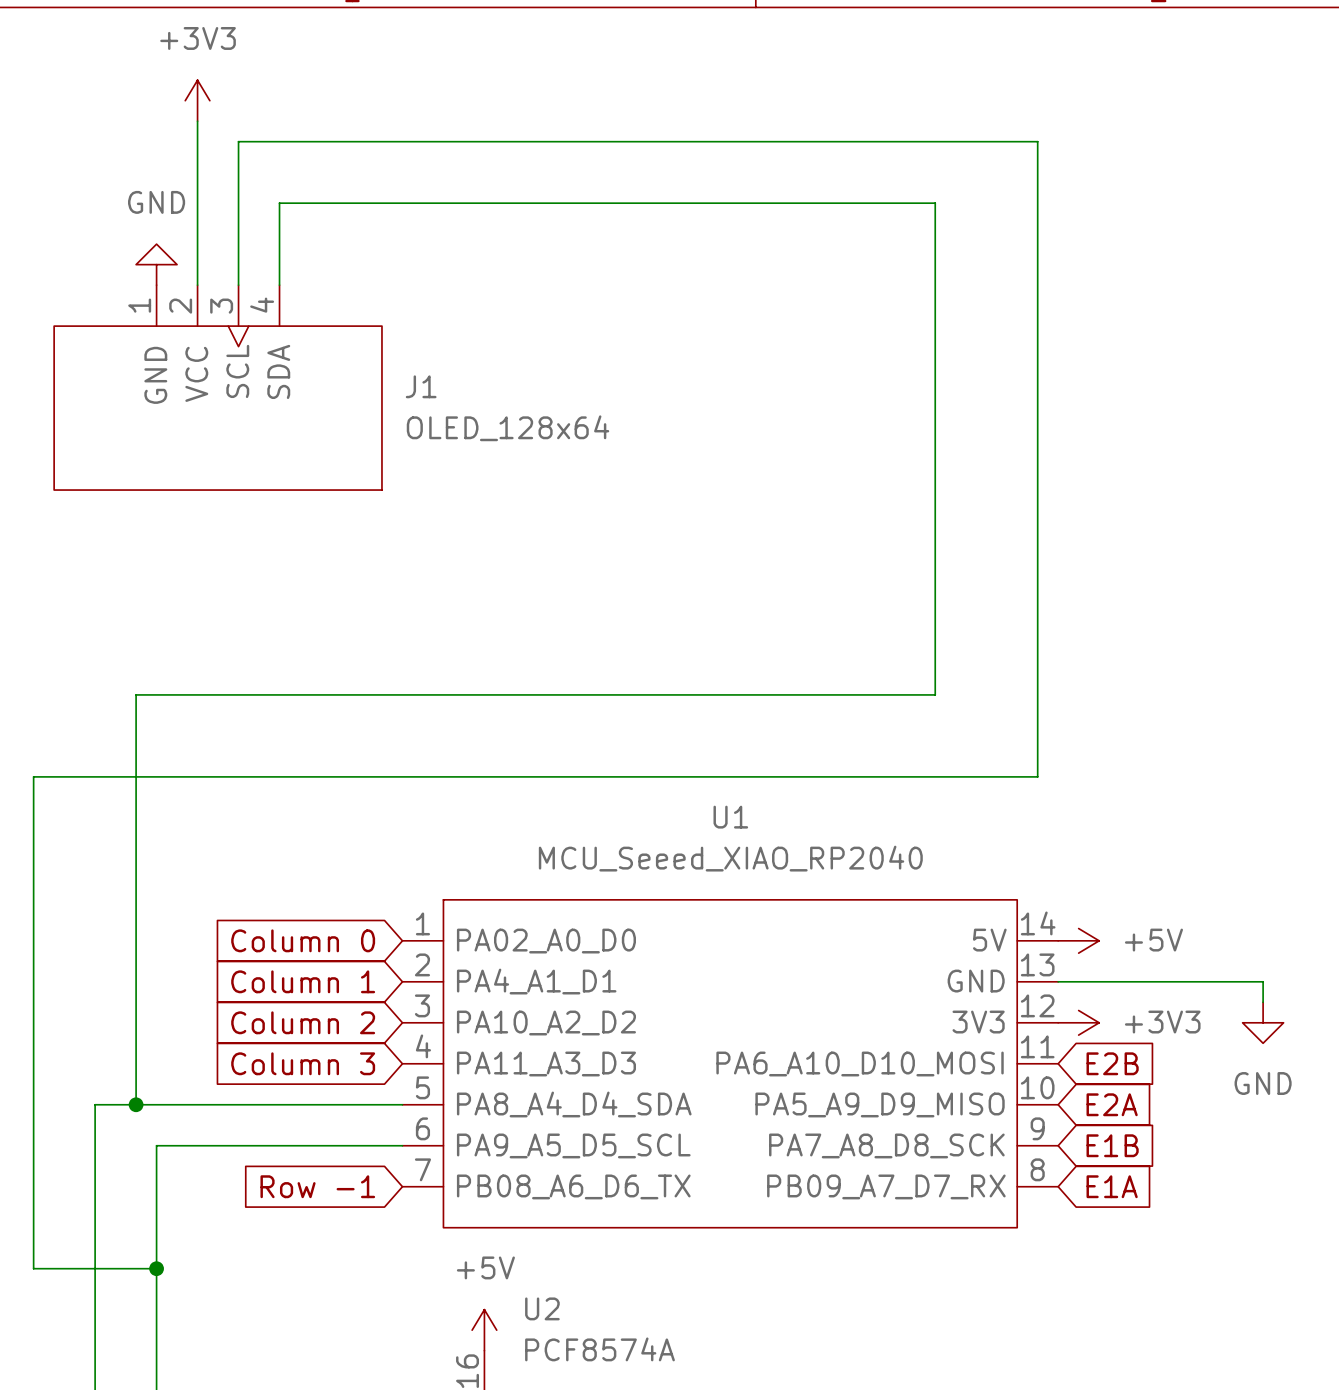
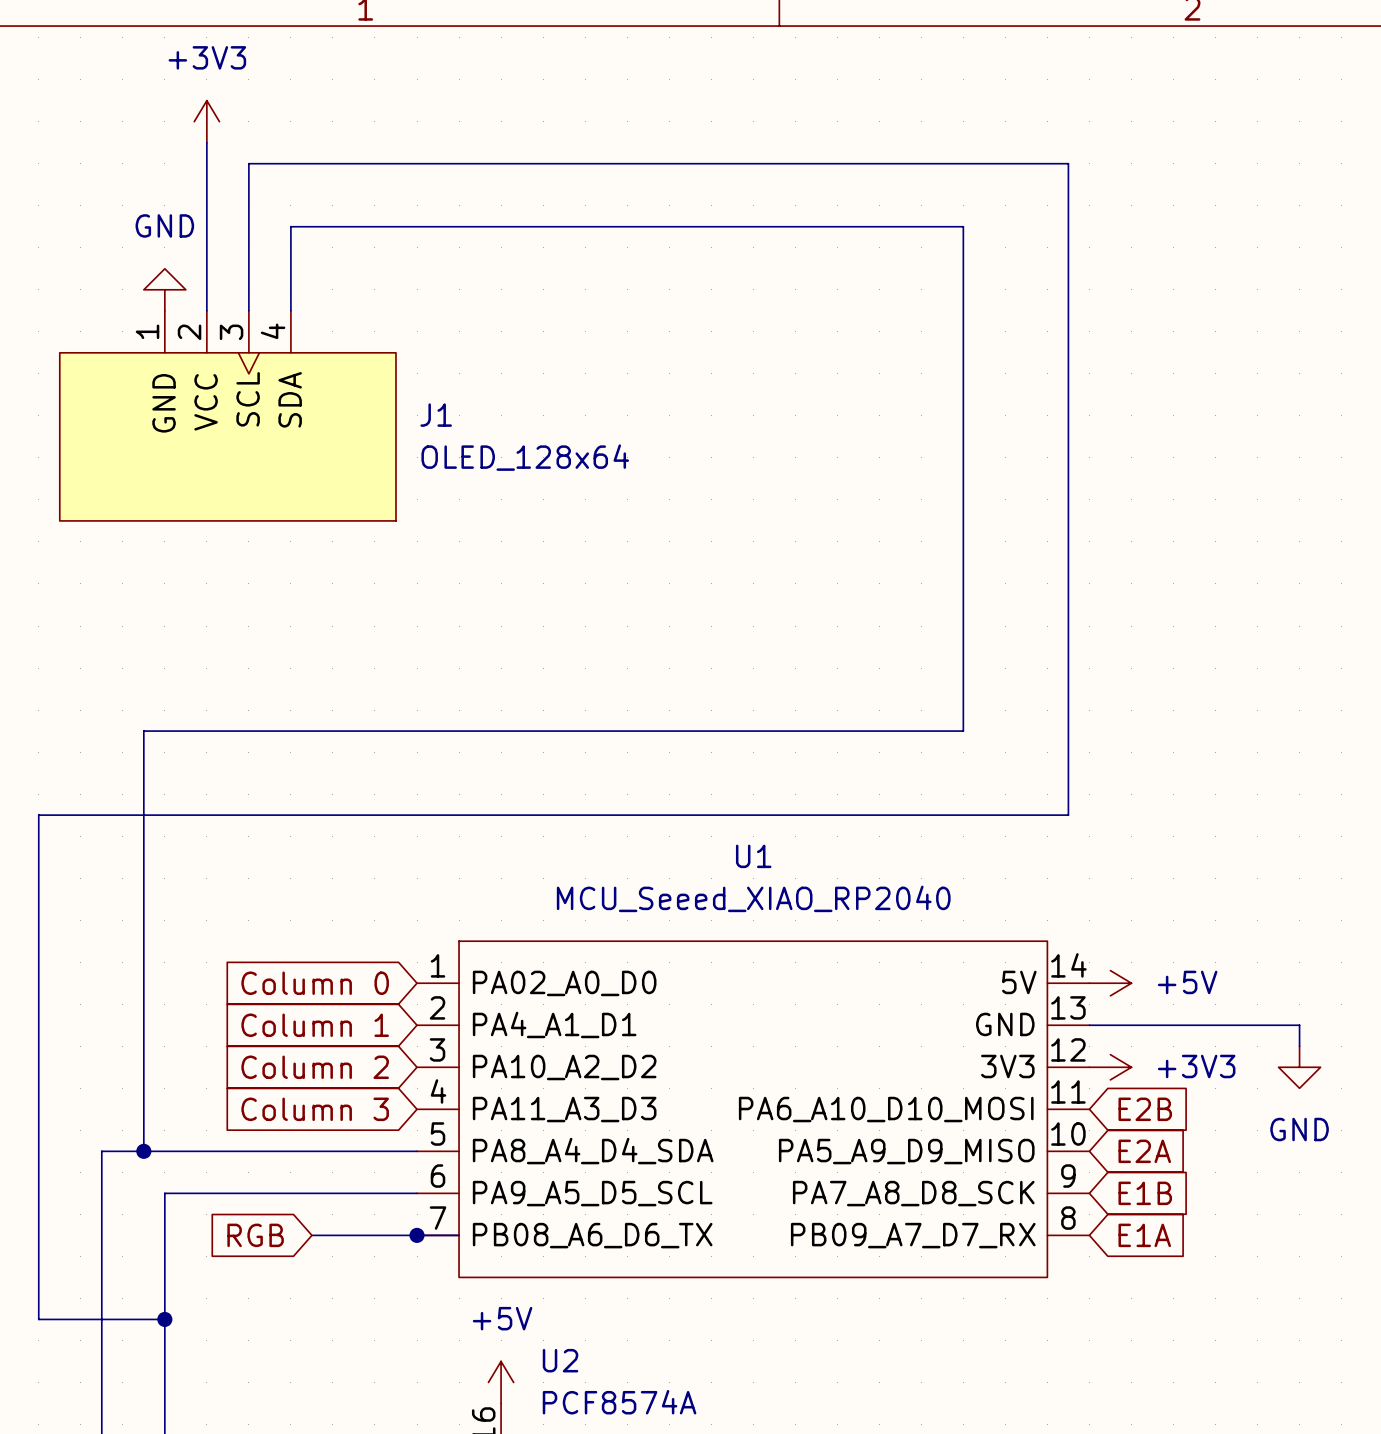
global label: none -> RGB (255, 1235)
wire: none -> (311, 1235) (459, 1235)
global label: Row -1 (317, 1186) -> none
junction: none -> (417, 1235)

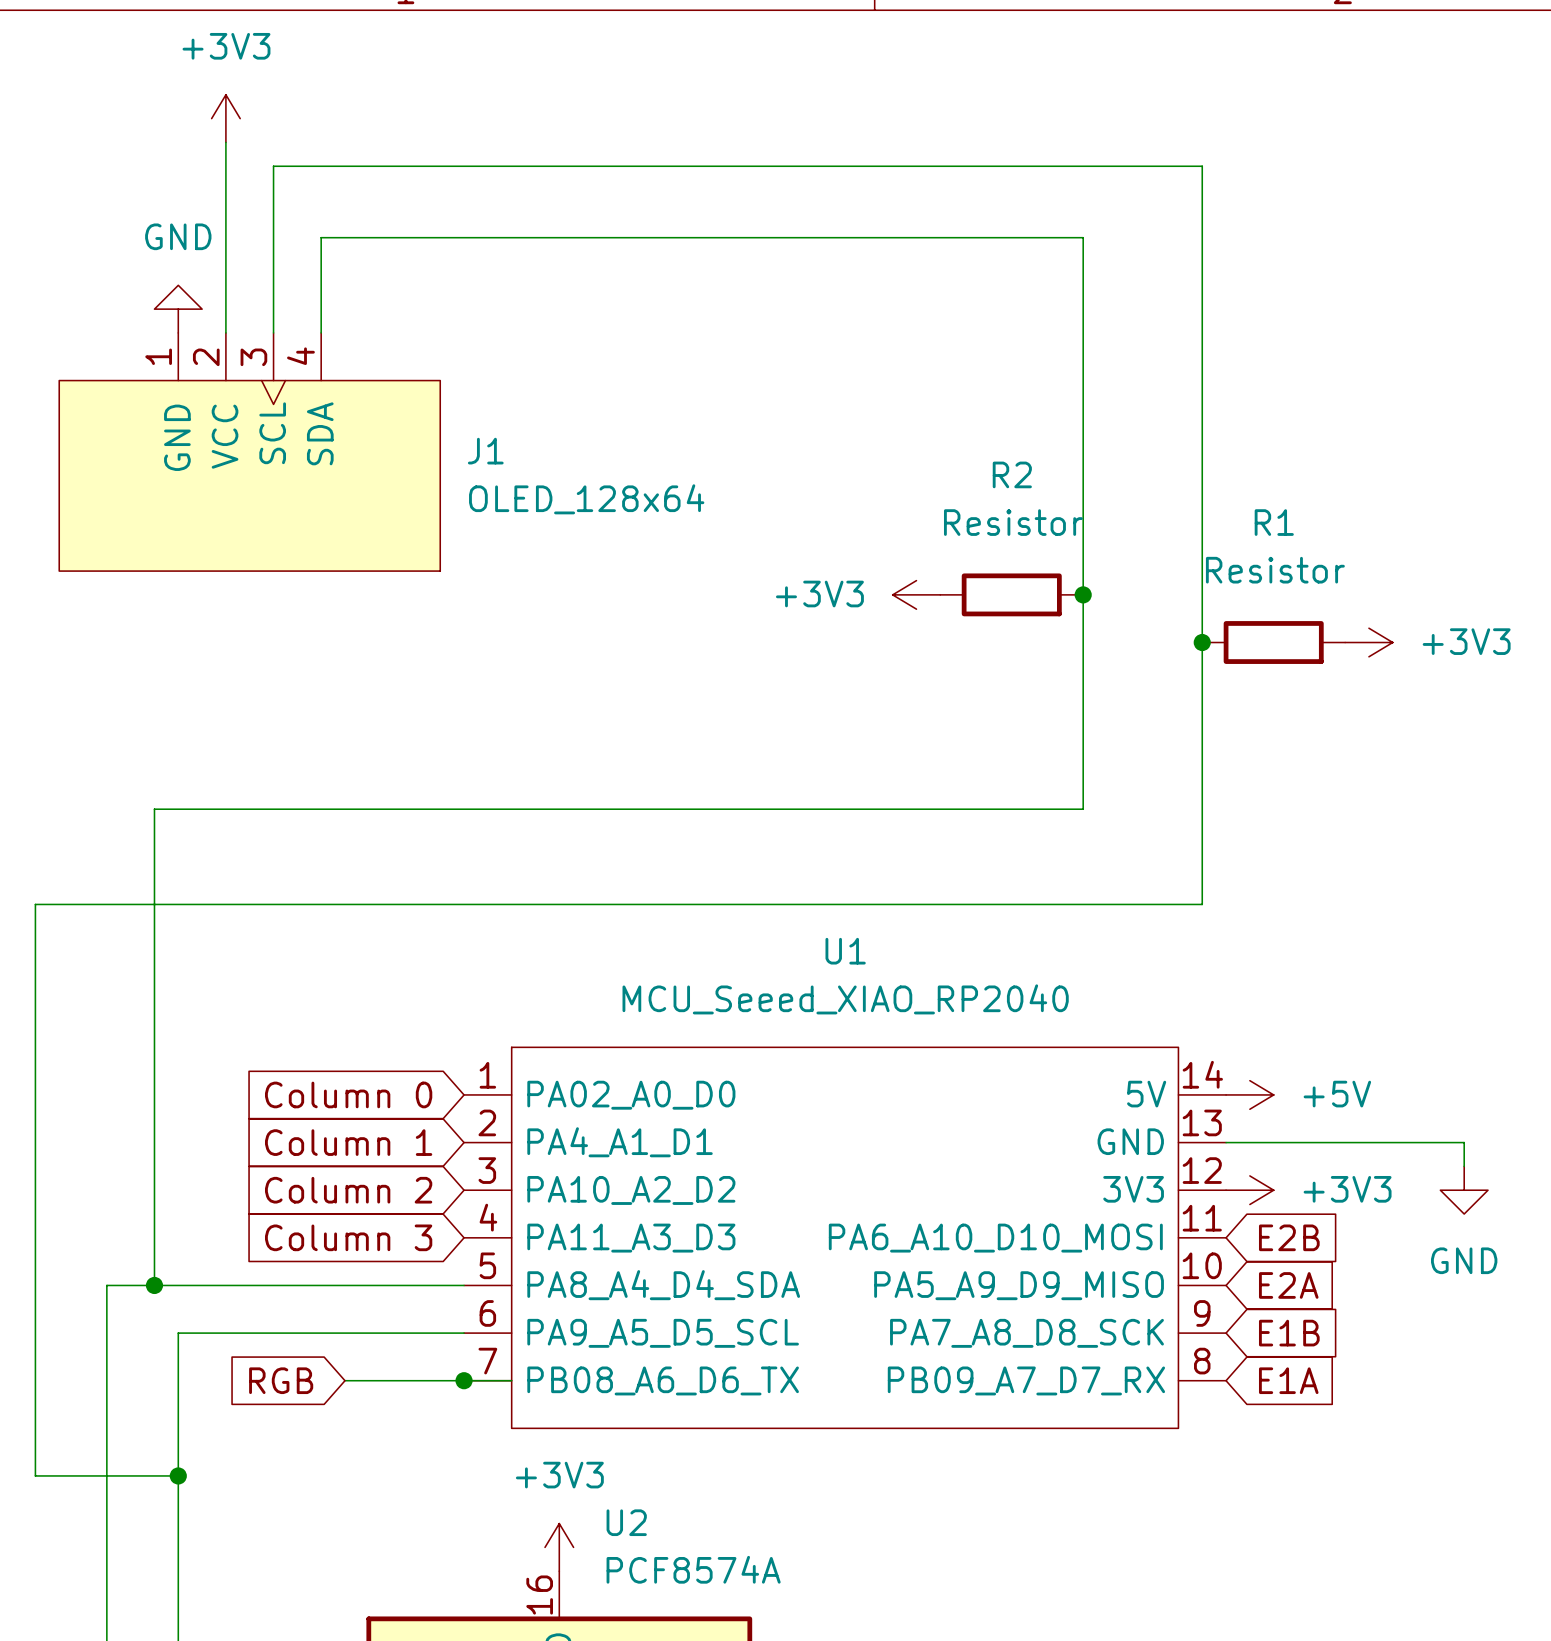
power symbol: none -> +3V3 (916, 594)
R2: none -> Resistor (1011, 594)
junction: none -> (1083, 594)
junction: none -> (1202, 642)
R1: none -> Resistor (1273, 642)
power symbol: none -> +3V3 (1368, 642)
power symbol: +5V (501, 1382) -> +3V3 (559, 1547)

